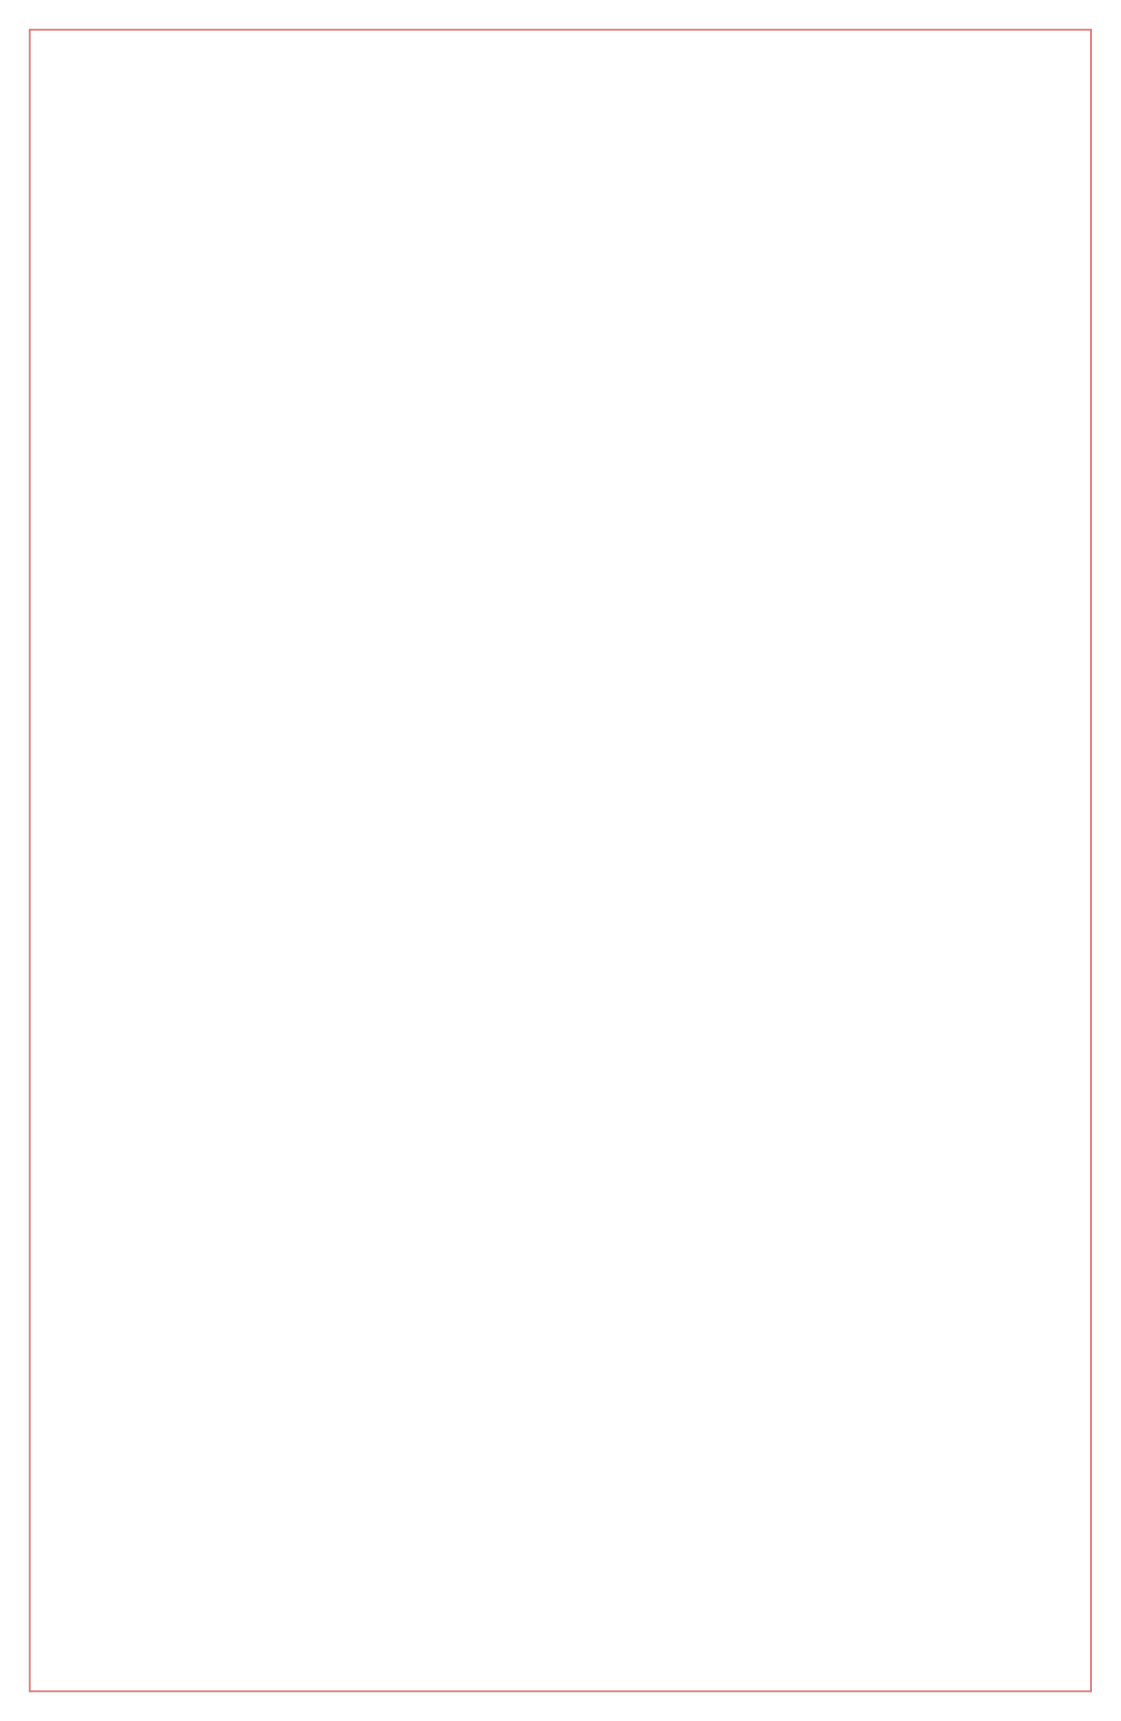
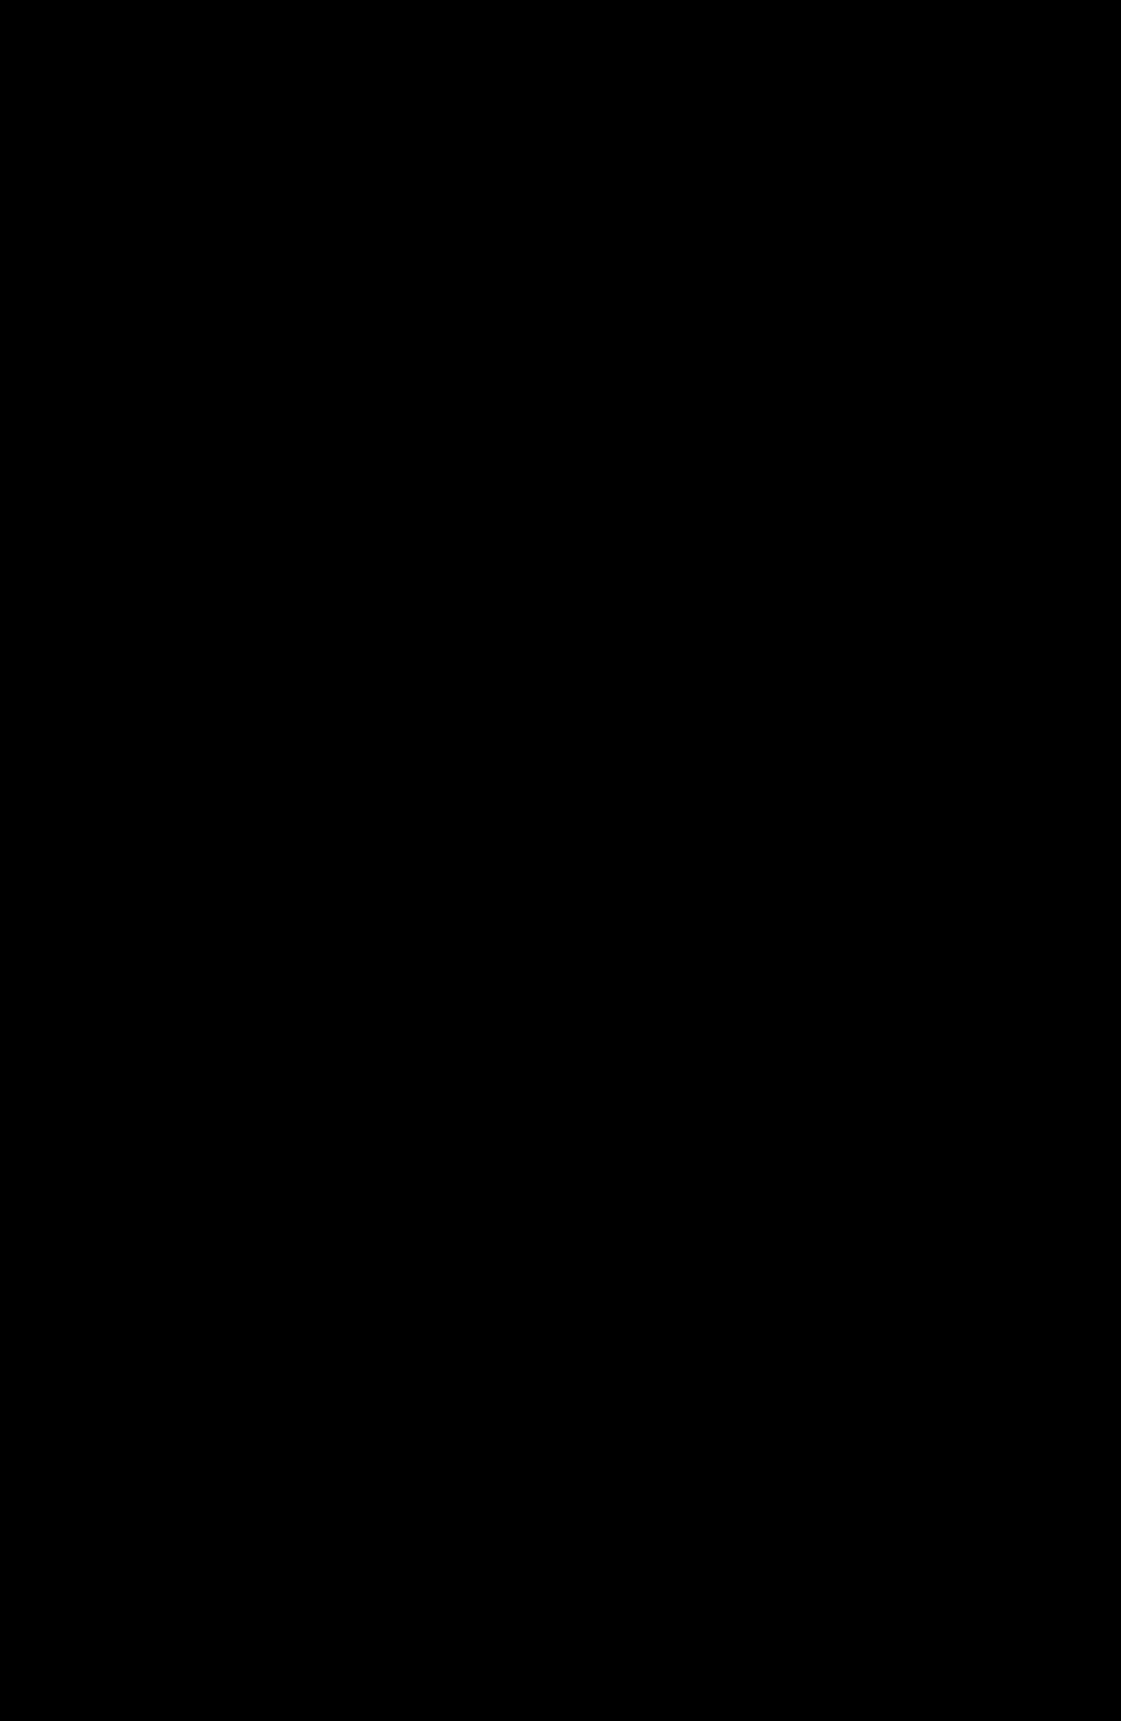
top track: (1091, 29) (29, 29) (29, 1691) (1091, 1691) (1091, 29) -> none

